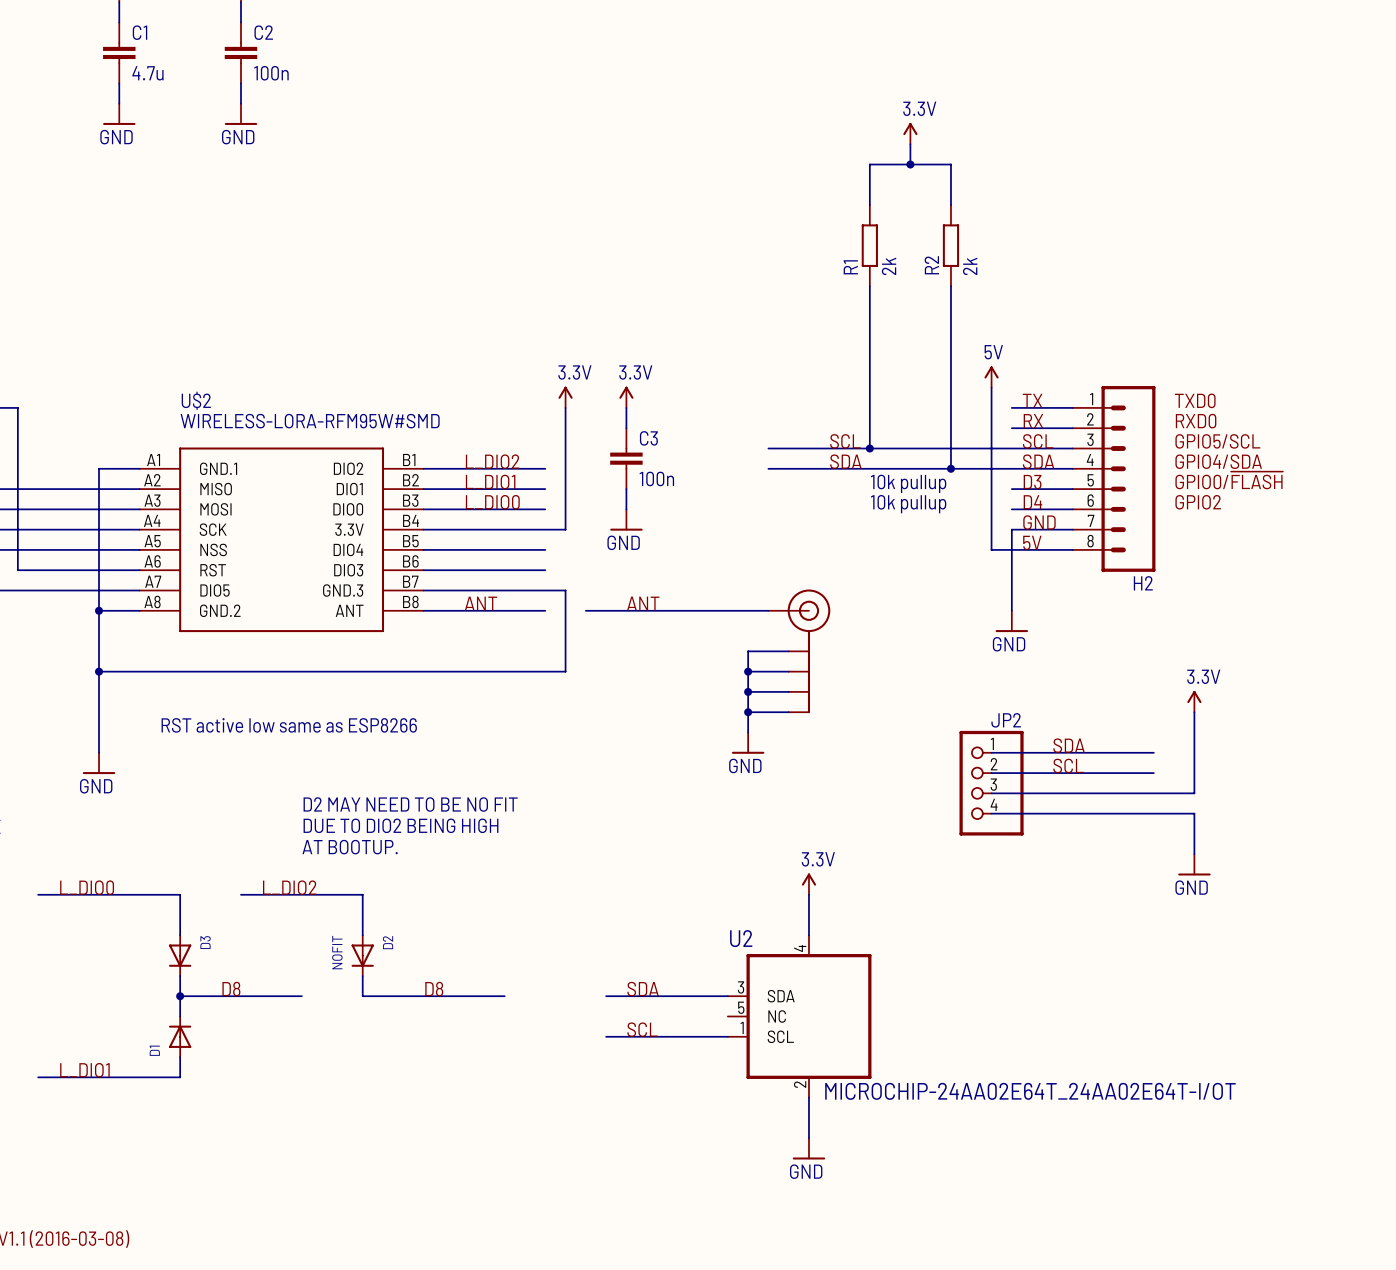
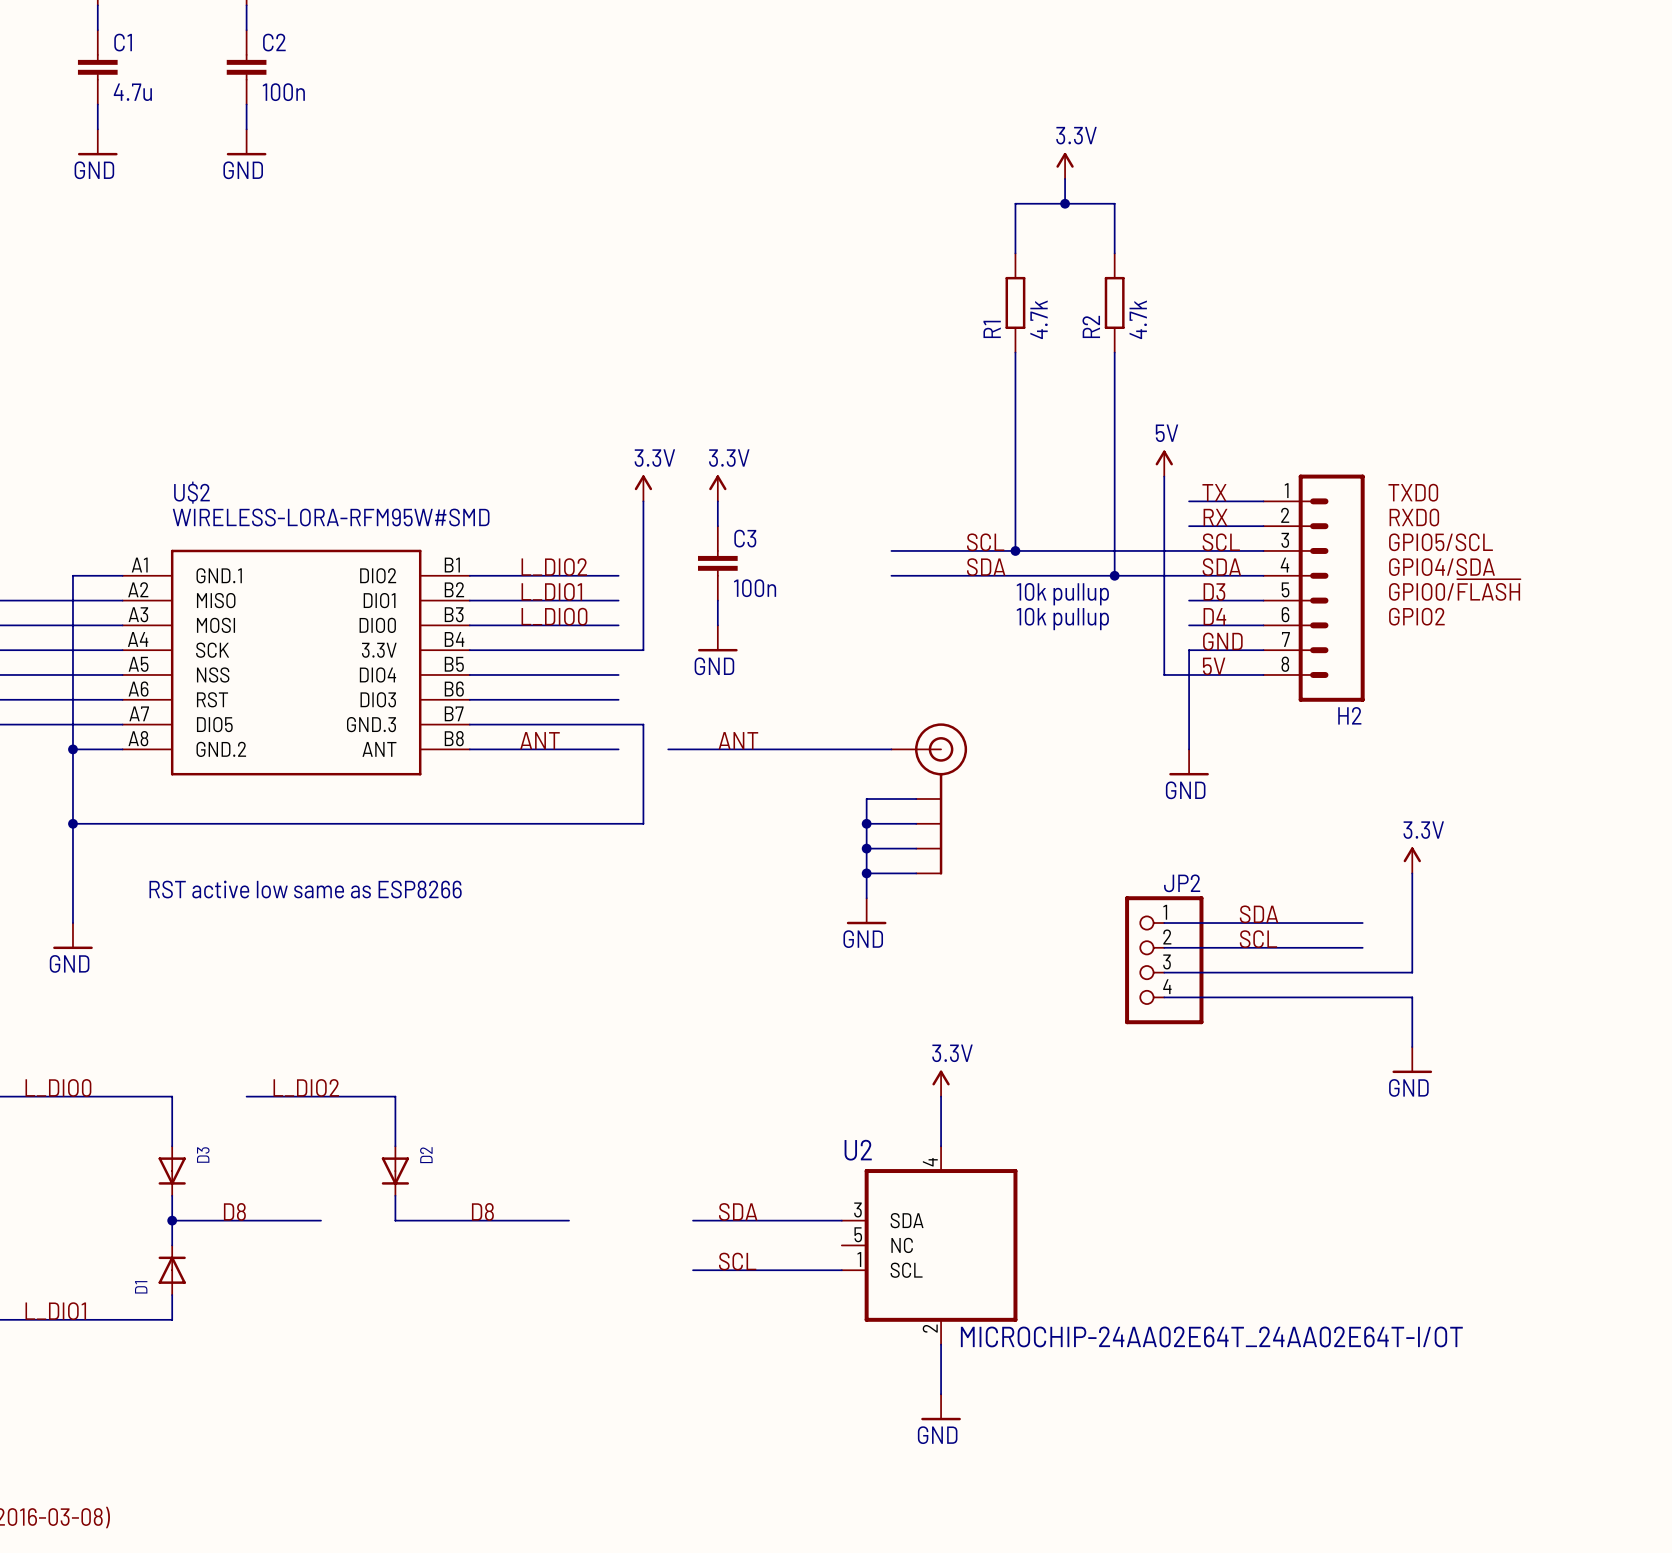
R1 value: 2k (889, 266) -> 4.7k (1039, 319)
R2 value: 2k (970, 266) -> 4.7k (1138, 319)
text: D2 MAY NEED TO BE NO FIT (410, 804) -> none
text: DUE TO DIO2 BEING HIGH (400, 825) -> none
text: AT BOOTUP. (350, 847) -> none
D2 value: NOFIT (337, 952) -> none

